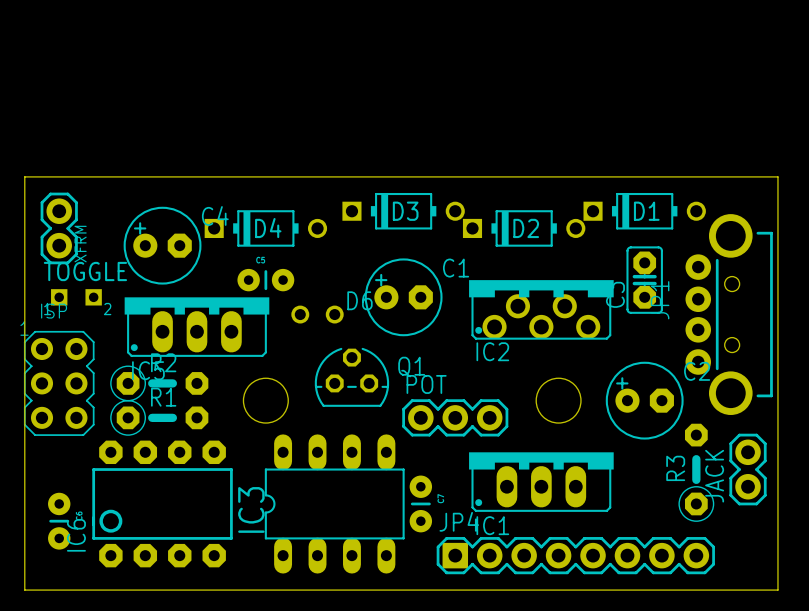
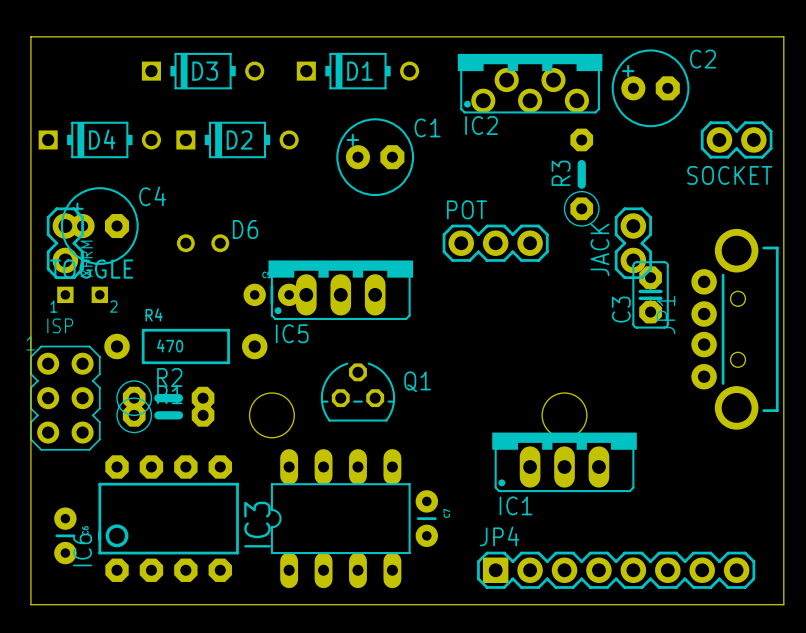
SOCKET: none -> (736, 139)
board edge: (24, 176) (777, 176) -> (30, 191) (30, 36) (783, 36) (783, 191)
D3 position: (403, 211) -> (203, 71)
D1 position: (644, 211) -> (357, 71)
D4 position: (265, 228) -> (99, 139)
D2 position: (524, 228) -> (237, 139)
C4 position: (162, 245) -> (99, 226)
TOGGLE position: (76, 297) -> (82, 294)
C1 position: (403, 297) -> (375, 157)
IC2 position: (541, 309) -> (530, 83)
D6 position: (317, 314) -> (203, 243)
IC5 position: (196, 327) -> (340, 290)
R4: none -> 470 (185, 346)
C2 position: (644, 400) -> (650, 88)
R1 position: (159, 417) -> (165, 415)
POT position: (455, 417) -> (495, 243)
JACK position: (748, 469) -> (633, 243)
R3 position: (696, 472) -> (581, 177)
IC1 position: (541, 482) -> (564, 462)
JP4 position: (575, 555) -> (616, 570)

